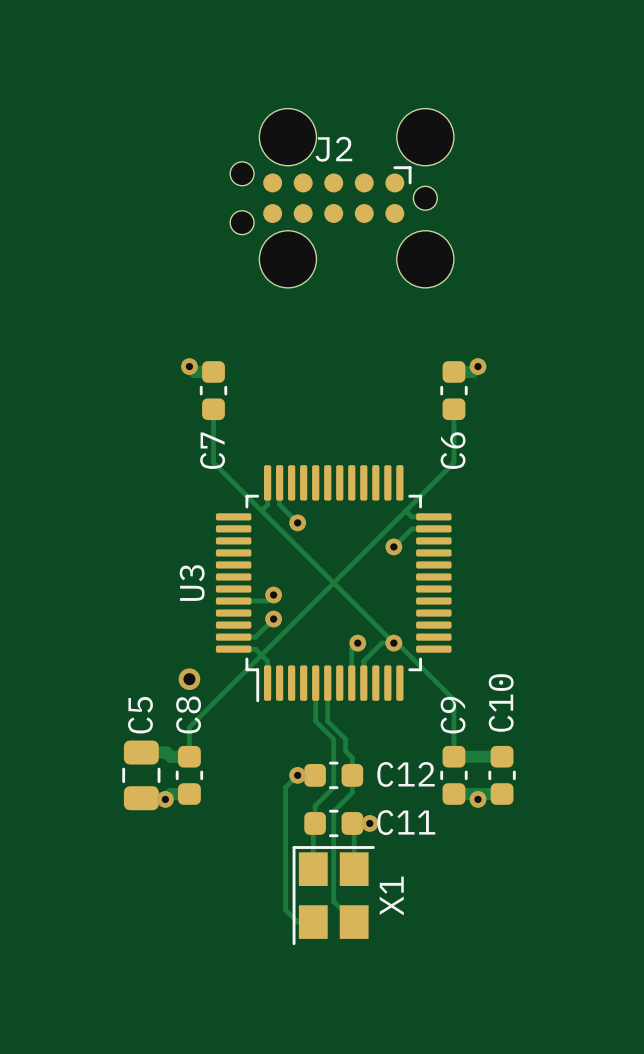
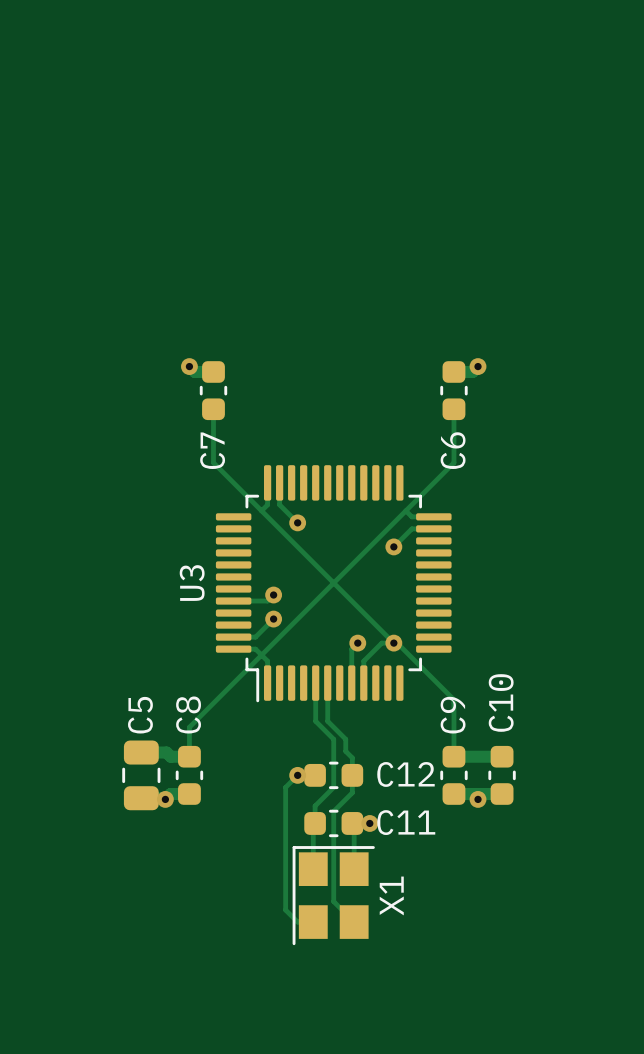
J2: (342, 198) -> none
via: (189, 679) -> none

